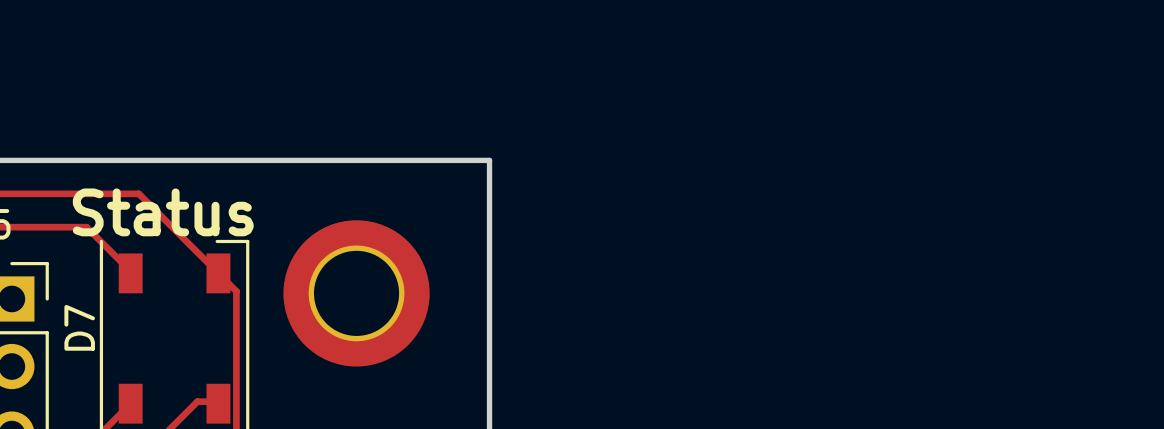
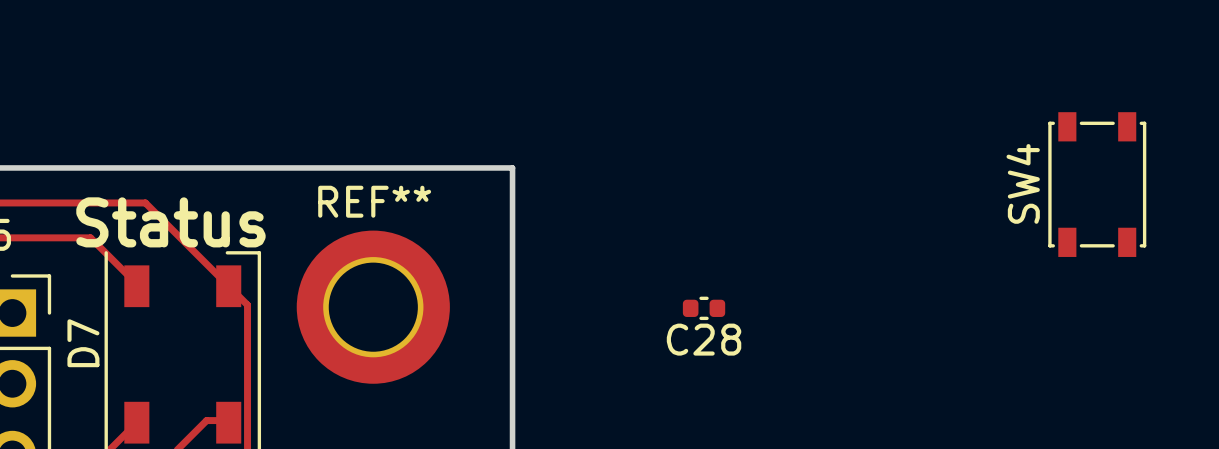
SW4: none -> (1097, 184)
REF** name: none -> REF** (374, 201)
C28: none -> (704, 308)

